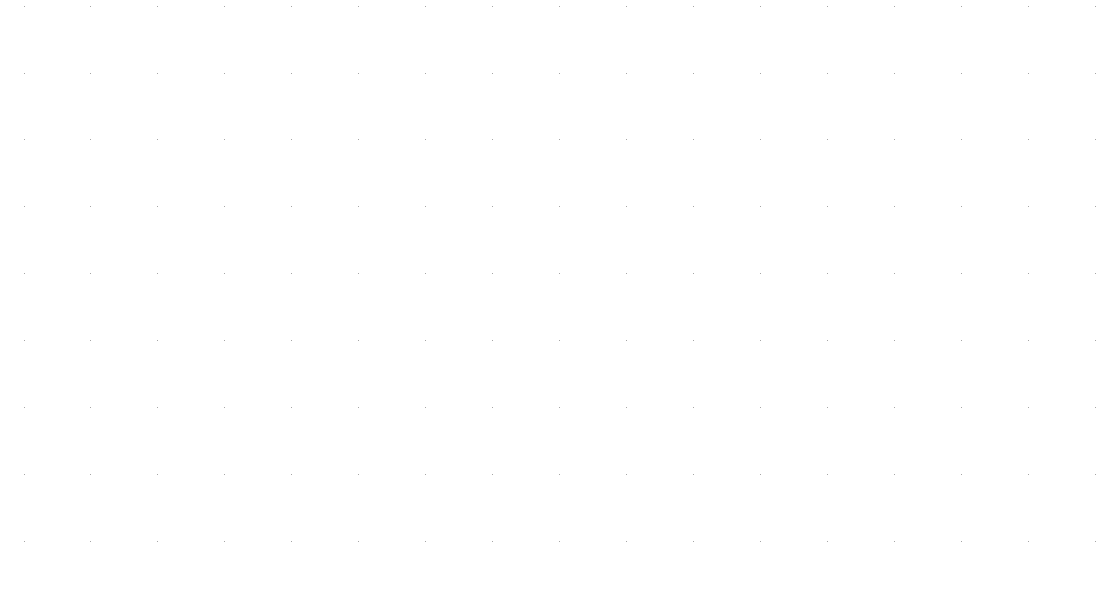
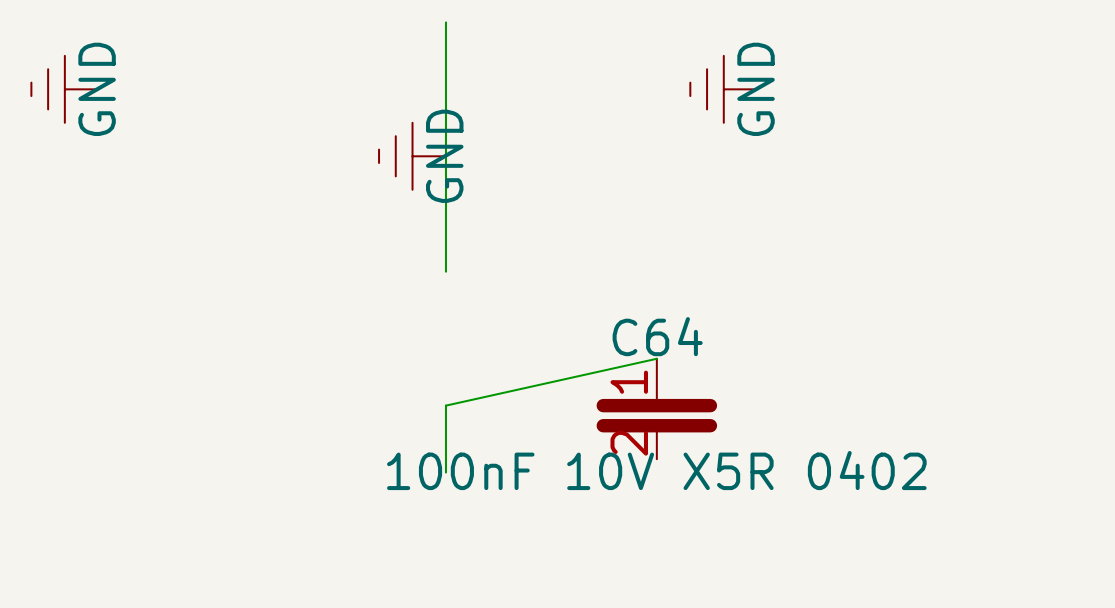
wire: none -> (445, 22) (445, 271)
power symbol: none -> GND (64, 89)
power symbol: none -> GND (723, 89)
power symbol: none -> GND (412, 156)
wire: none -> (656, 358) (445, 405) (445, 472)
C64: none -> 100nF 10V X5R 0402 (656, 408)

